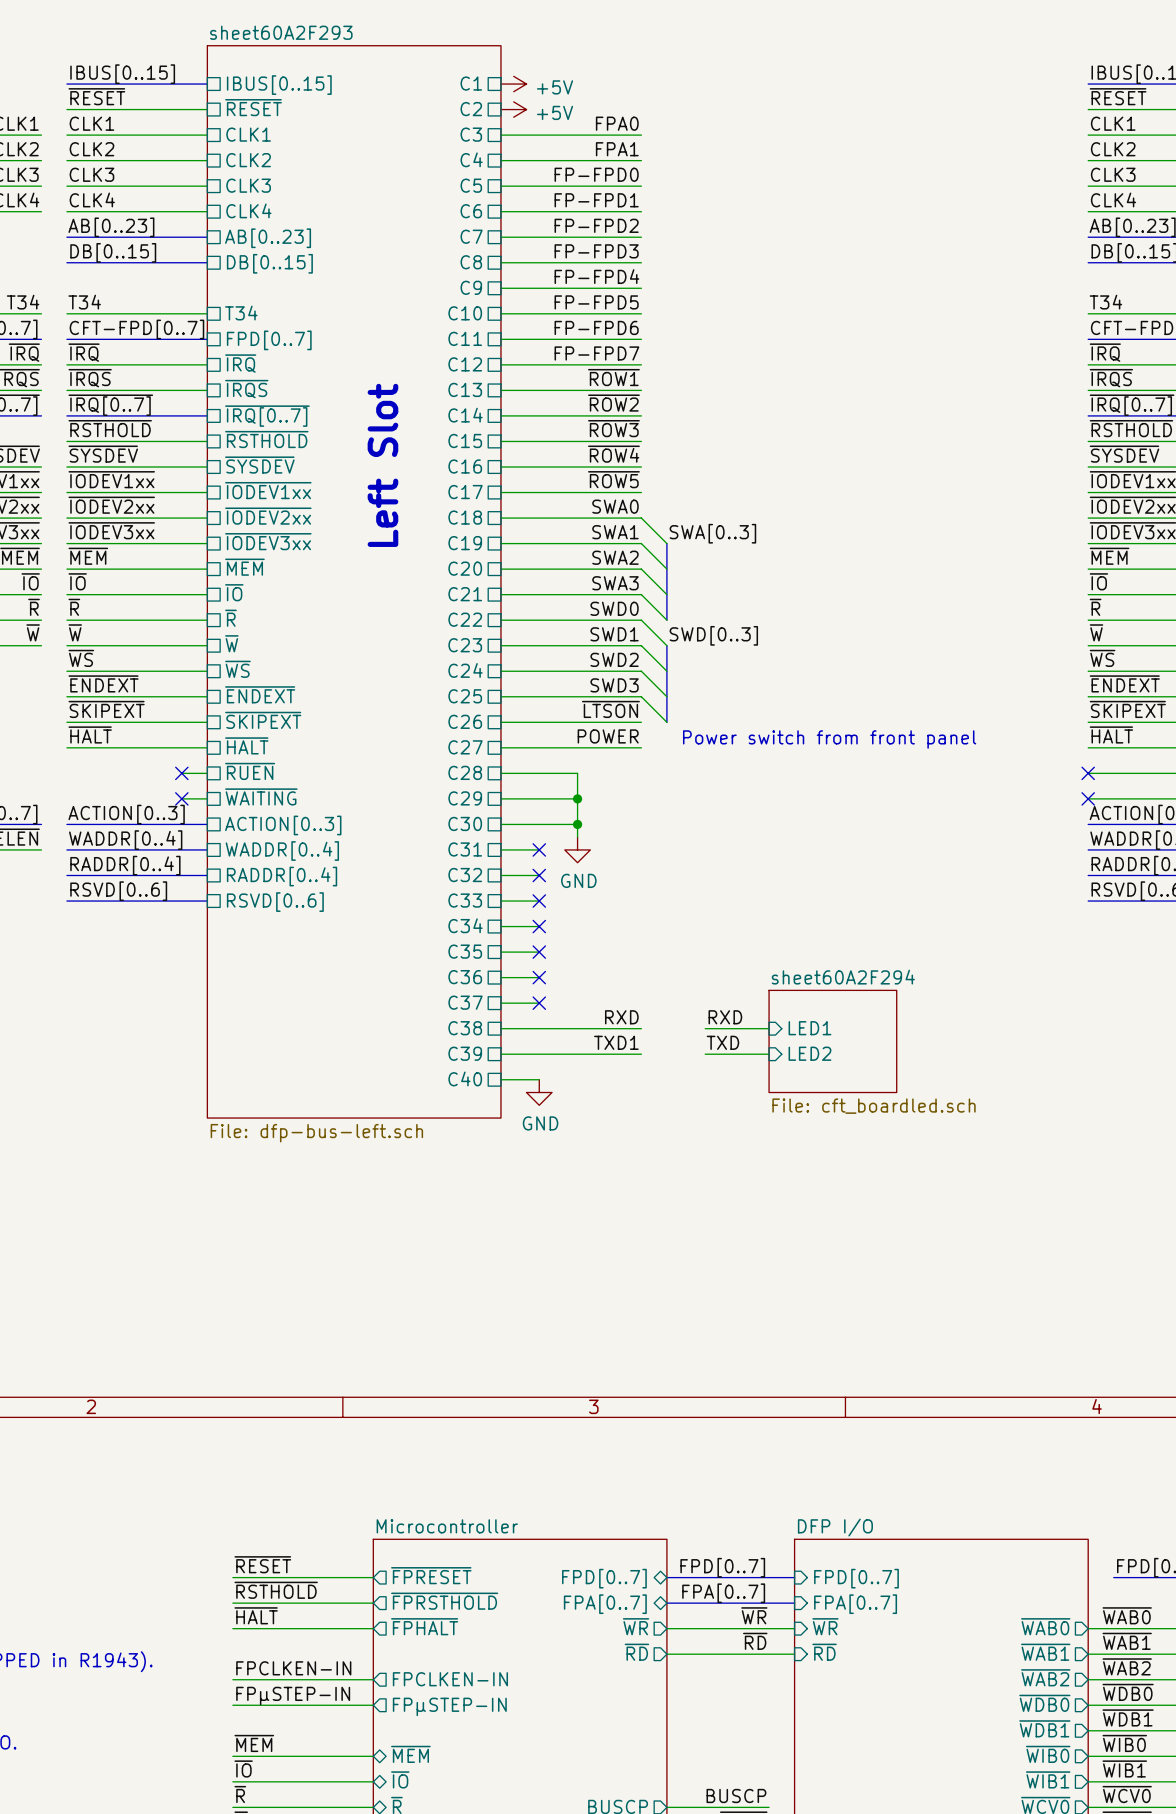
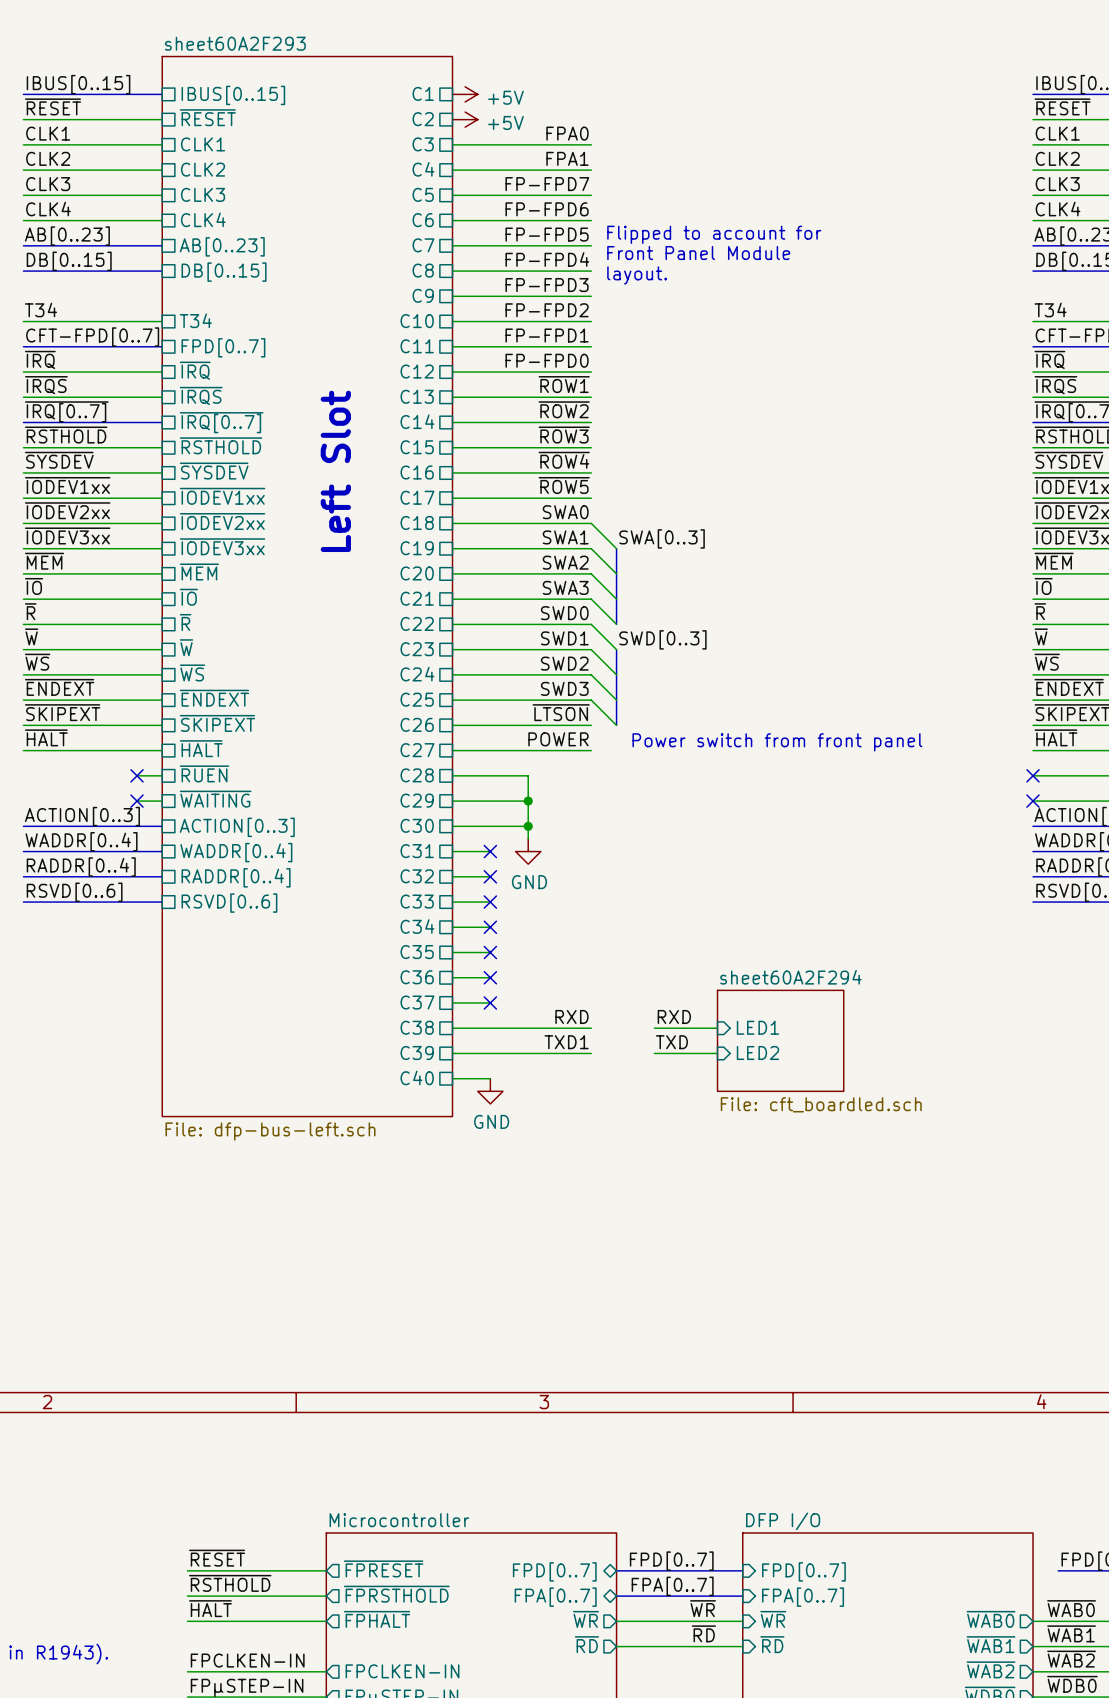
label: FP-FPD0 (596, 174) -> FP-FPD7 (547, 184)
label: FP-FPD1 (596, 200) -> FP-FPD6 (547, 209)
label: FP-FPD2 (596, 225) -> FP-FPD5 (547, 234)
text: none -> Flipped to account for (714, 234)
text: none -> Front Panel Module (698, 253)
label: FP-FPD3 (596, 251) -> FP-FPD4 (547, 259)
text: none -> layout. (637, 275)
label: FP-FPD4 (596, 276) -> FP-FPD3 (547, 285)
label: FP-FPD5 (596, 302) -> FP-FPD2 (547, 310)
label: FP-FPD6 (596, 327) -> FP-FPD1 (547, 335)
label: FP-FPD7 (596, 353) -> FP-FPD0 (547, 360)

